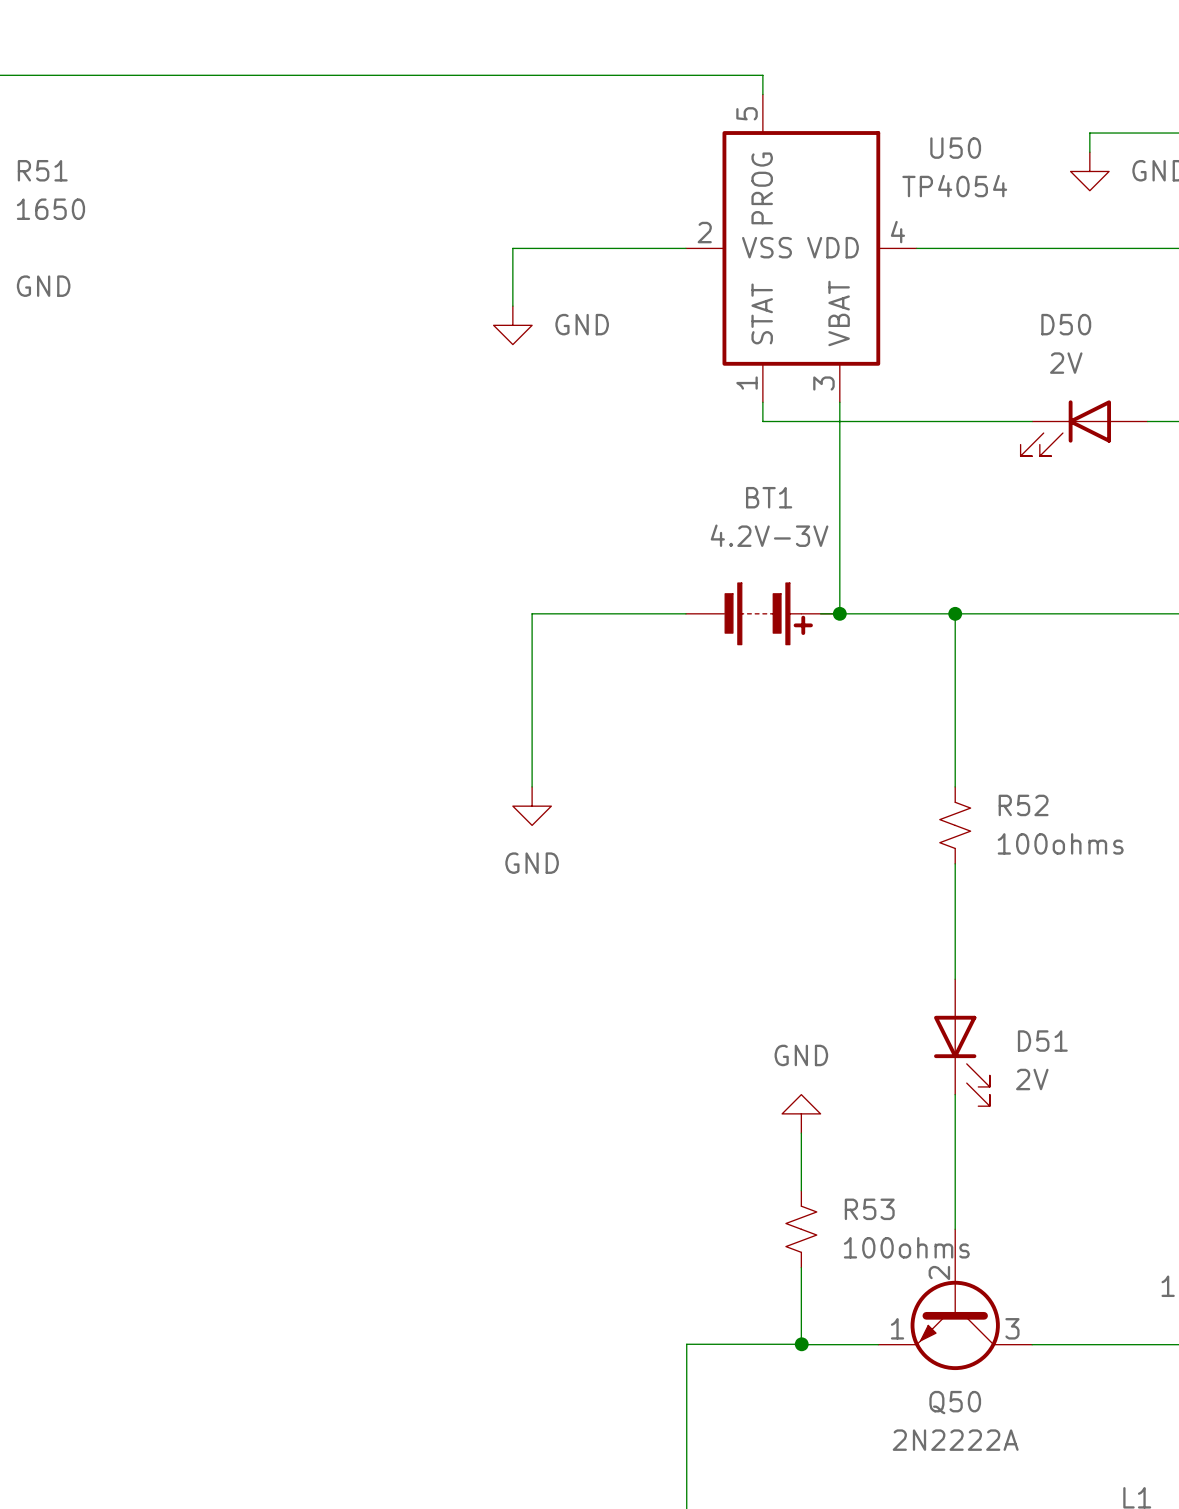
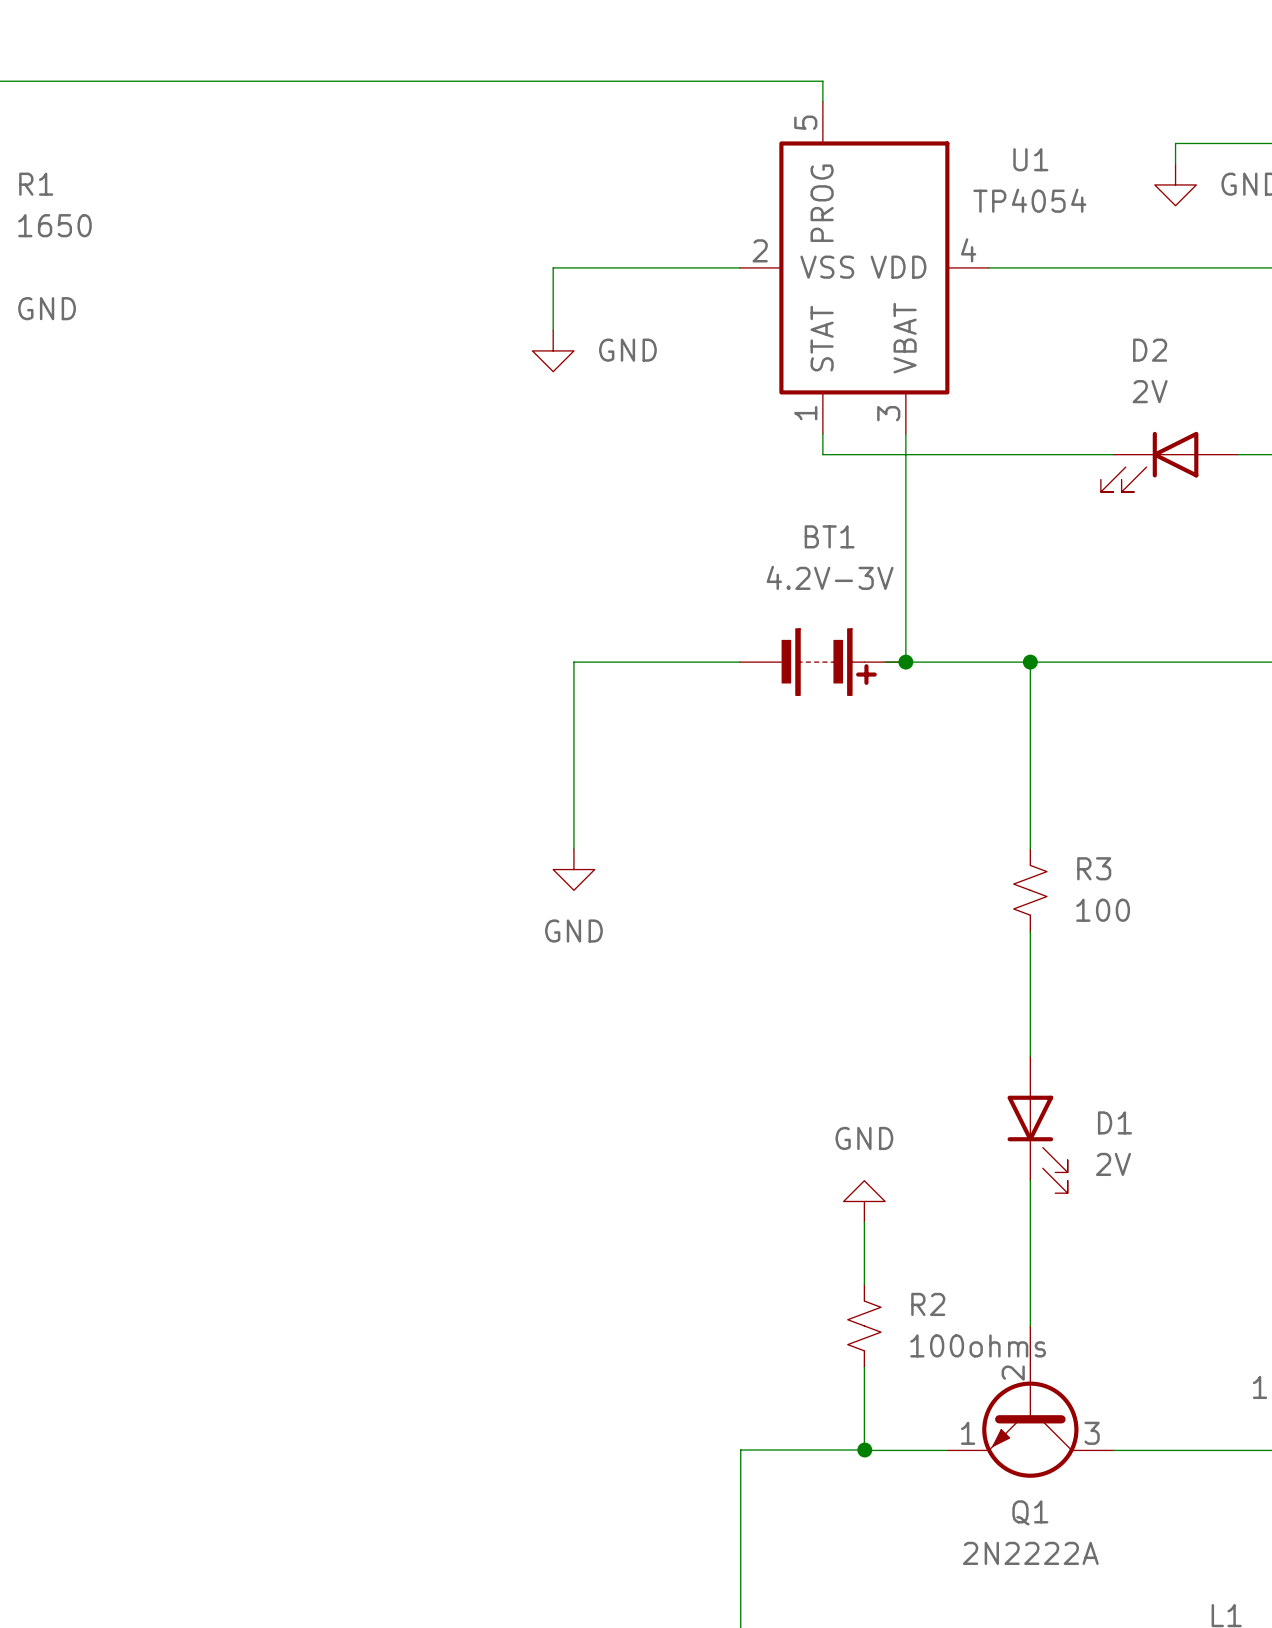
U50 name: U50 (955, 148) -> U1 (1030, 159)
R51 name: R51 (42, 170) -> R1 (36, 184)
D50 name: D50 (1066, 324) -> D2 (1150, 350)
R52 name: R52 (1023, 805) -> R3 (1094, 868)
R52 value: 100ohms (1060, 843) -> 100 (1103, 910)
D51 name: D51 (1042, 1041) -> D1 (1114, 1122)
R53 name: R53 (869, 1209) -> R2 (928, 1304)
Q50 name: Q50 (955, 1402) -> Q1 (1030, 1512)

